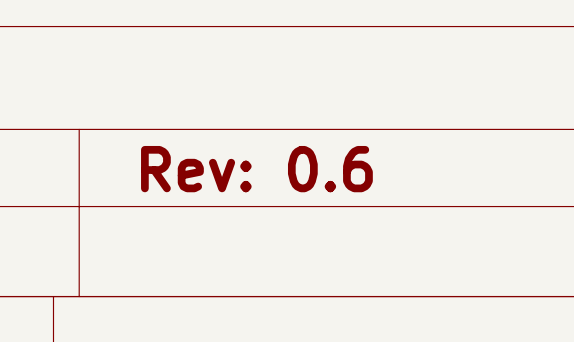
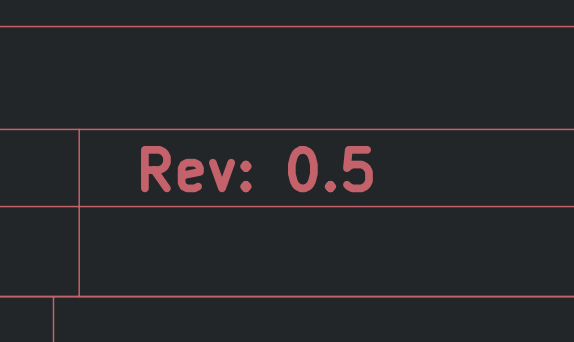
title block: Rev: 0.6 (256, 169) -> Rev: 0.5 (256, 169)

